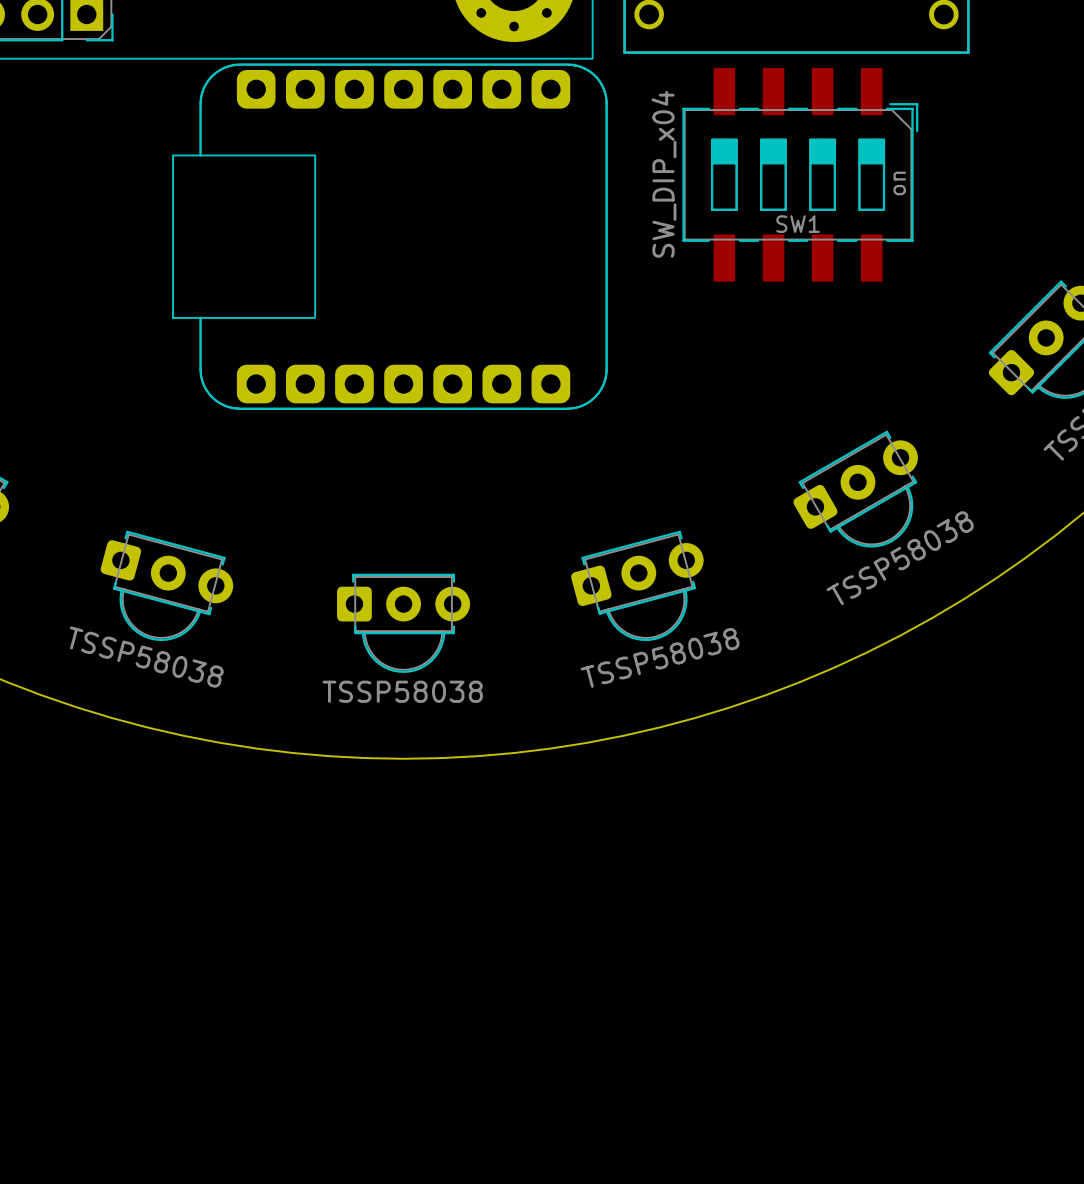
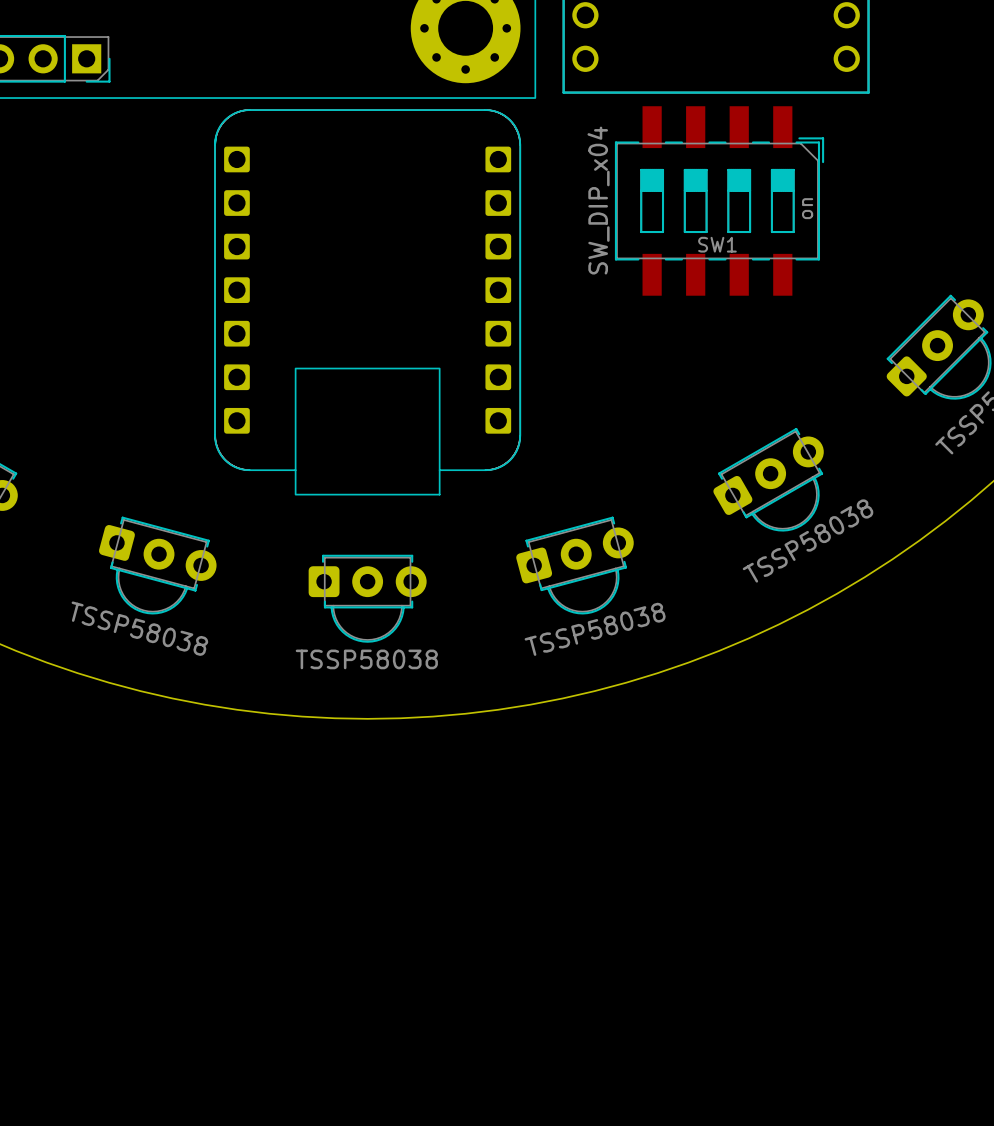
part: (389, 236) -> none
part: none -> (367, 302)

